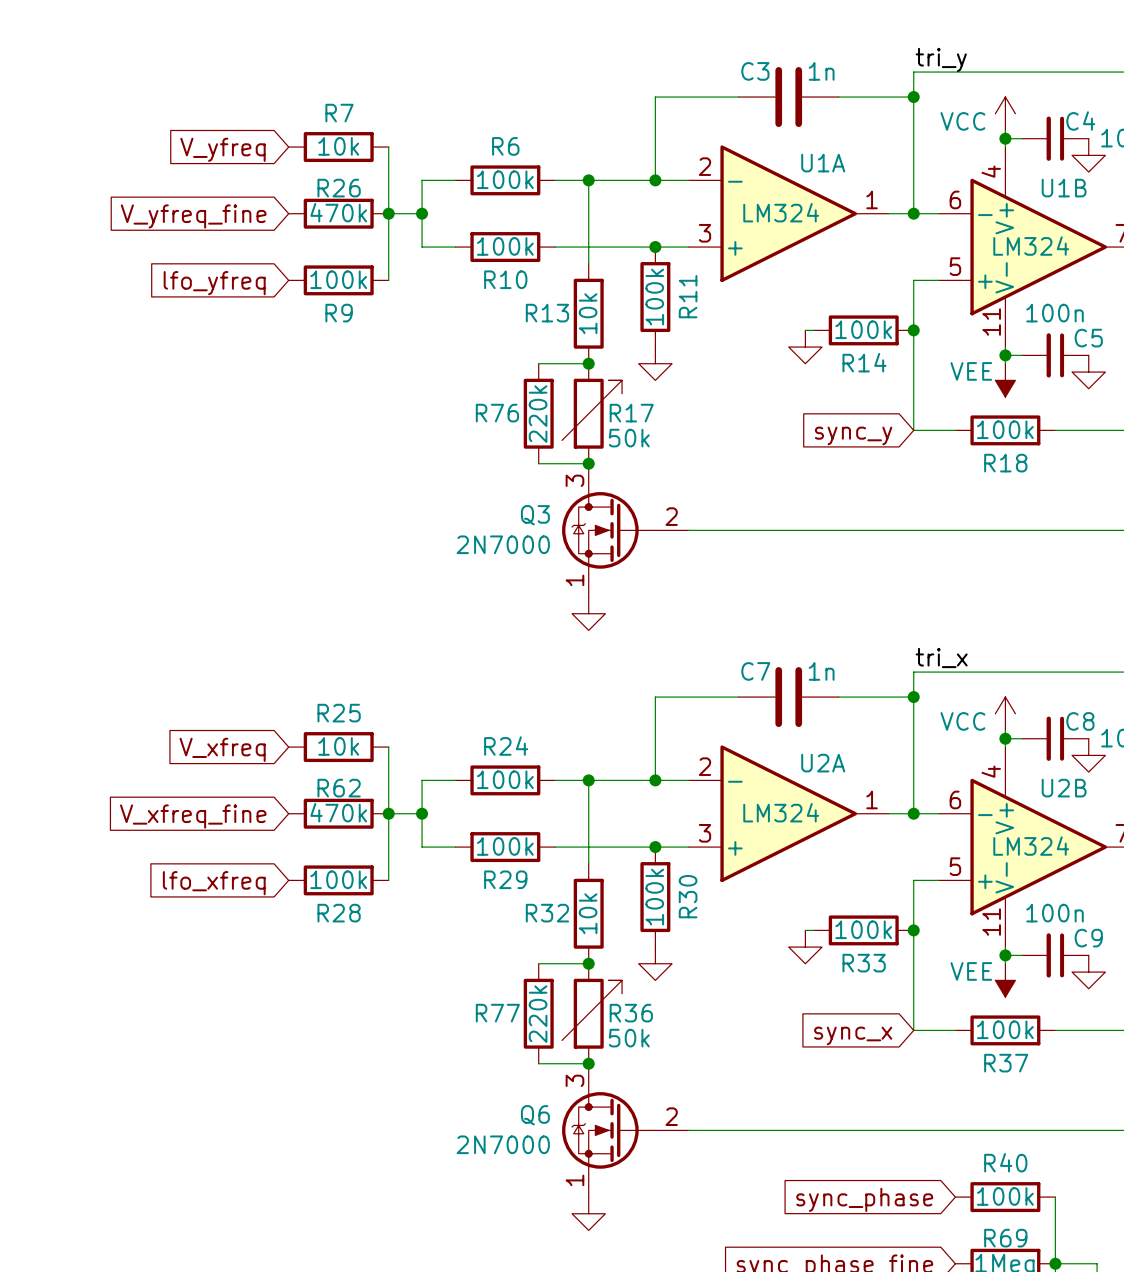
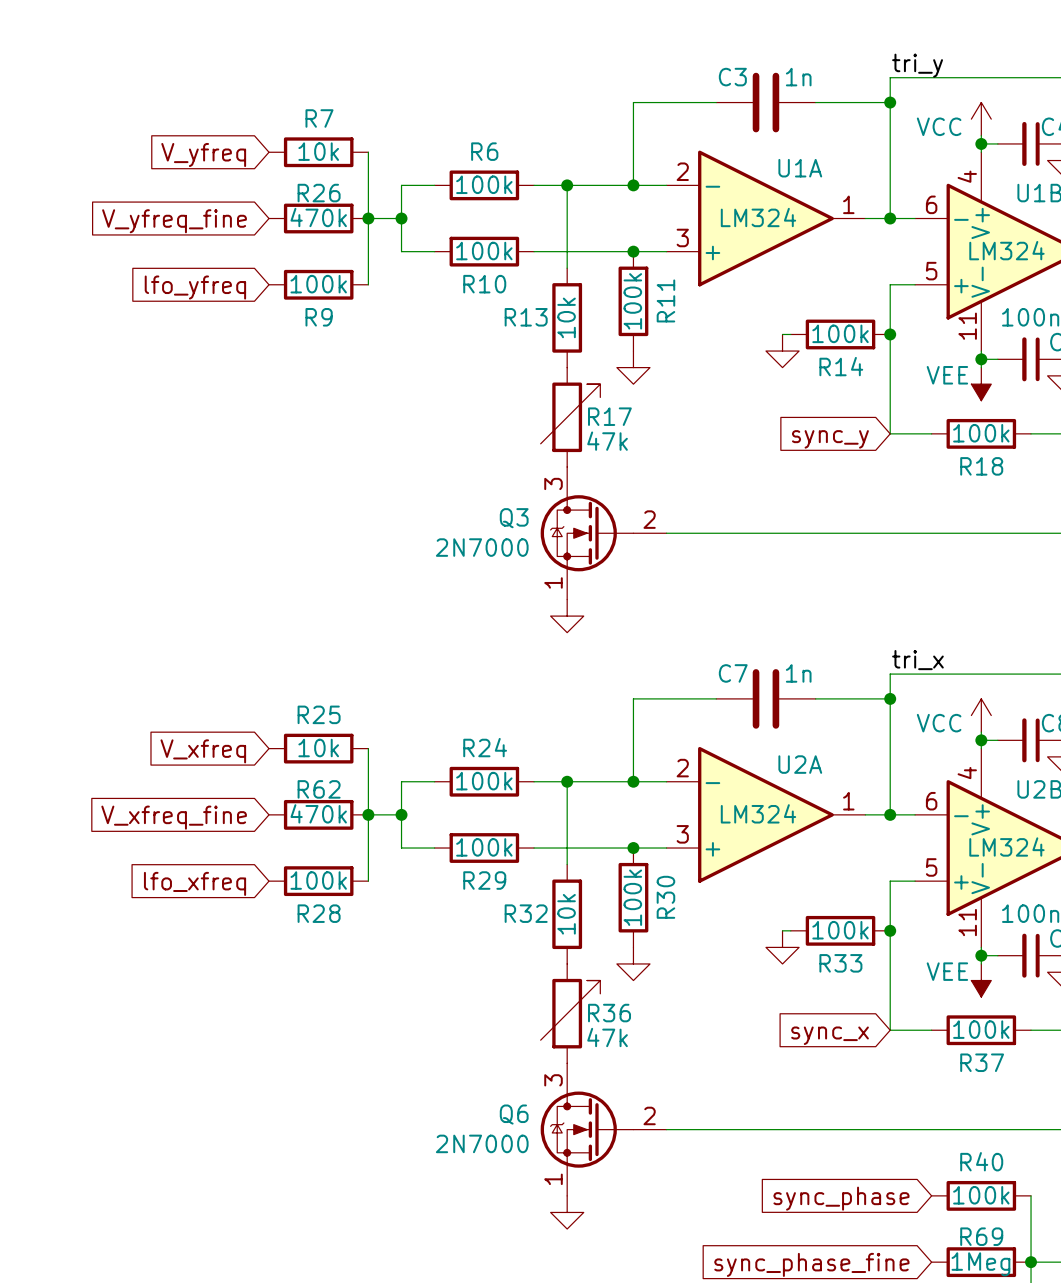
wire: (538, 363) (588, 363) -> none
junction: (588, 363) -> none
R76: 220k (538, 413) -> none
R17 value: 50k (629, 438) -> 47k (607, 441)
wire: (538, 463) (588, 463) -> none
junction: (588, 463) -> none
wire: (538, 963) (588, 963) -> none
junction: (588, 963) -> none
R77: 220k (538, 1013) -> none
R36 value: 50k (629, 1038) -> 47k (607, 1037)
wire: (538, 1063) (588, 1063) -> none
junction: (588, 1063) -> none

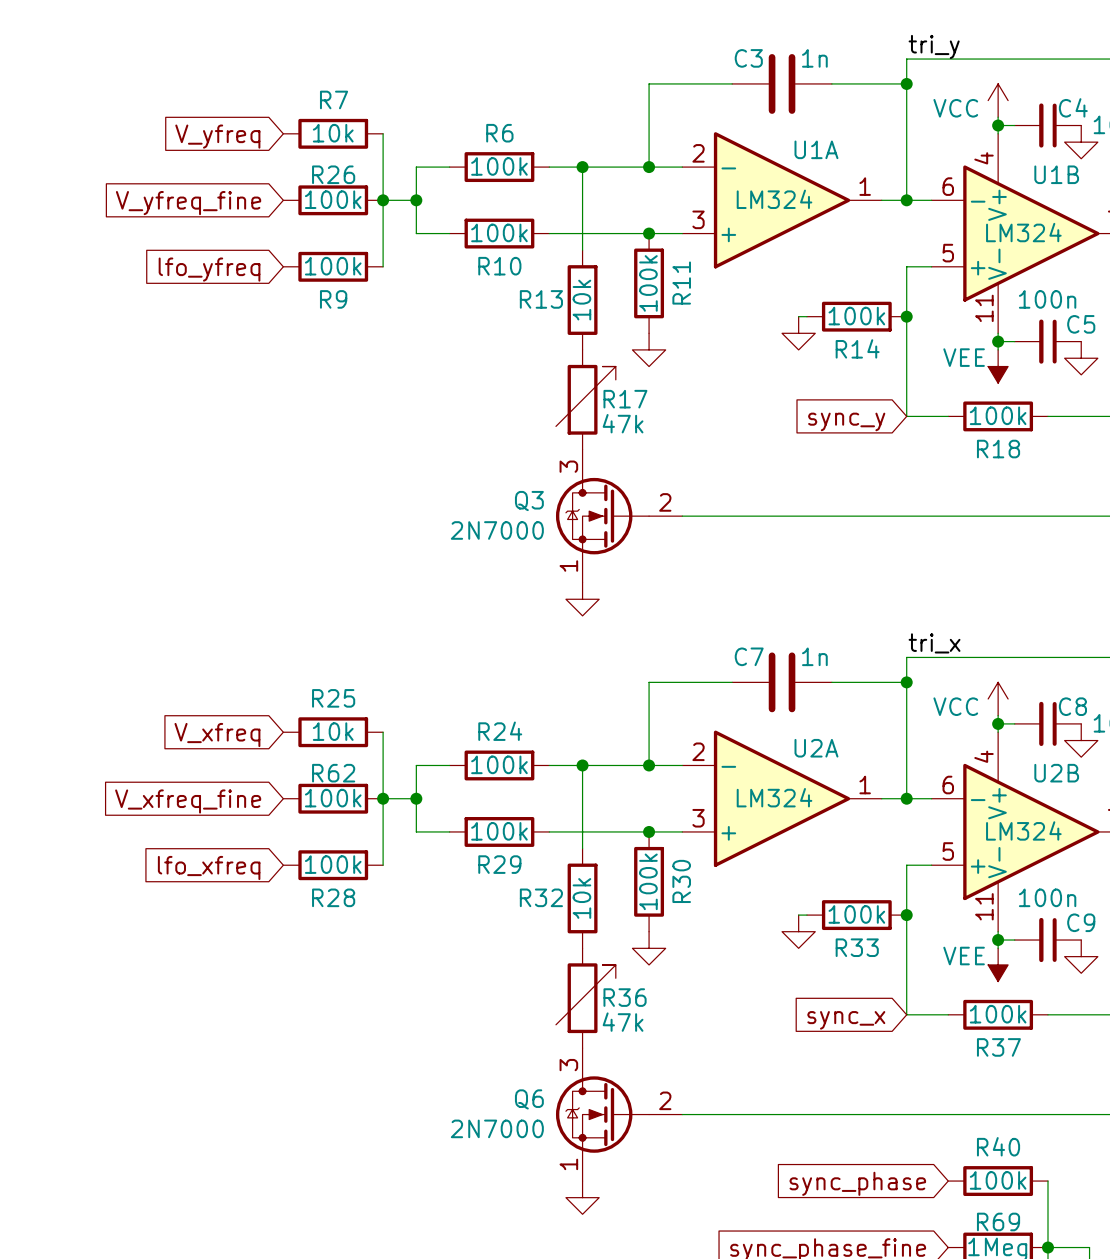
R26 value: 470k (318, 217) -> 100k (333, 199)
R62 value: 470k (318, 813) -> 100k (333, 798)

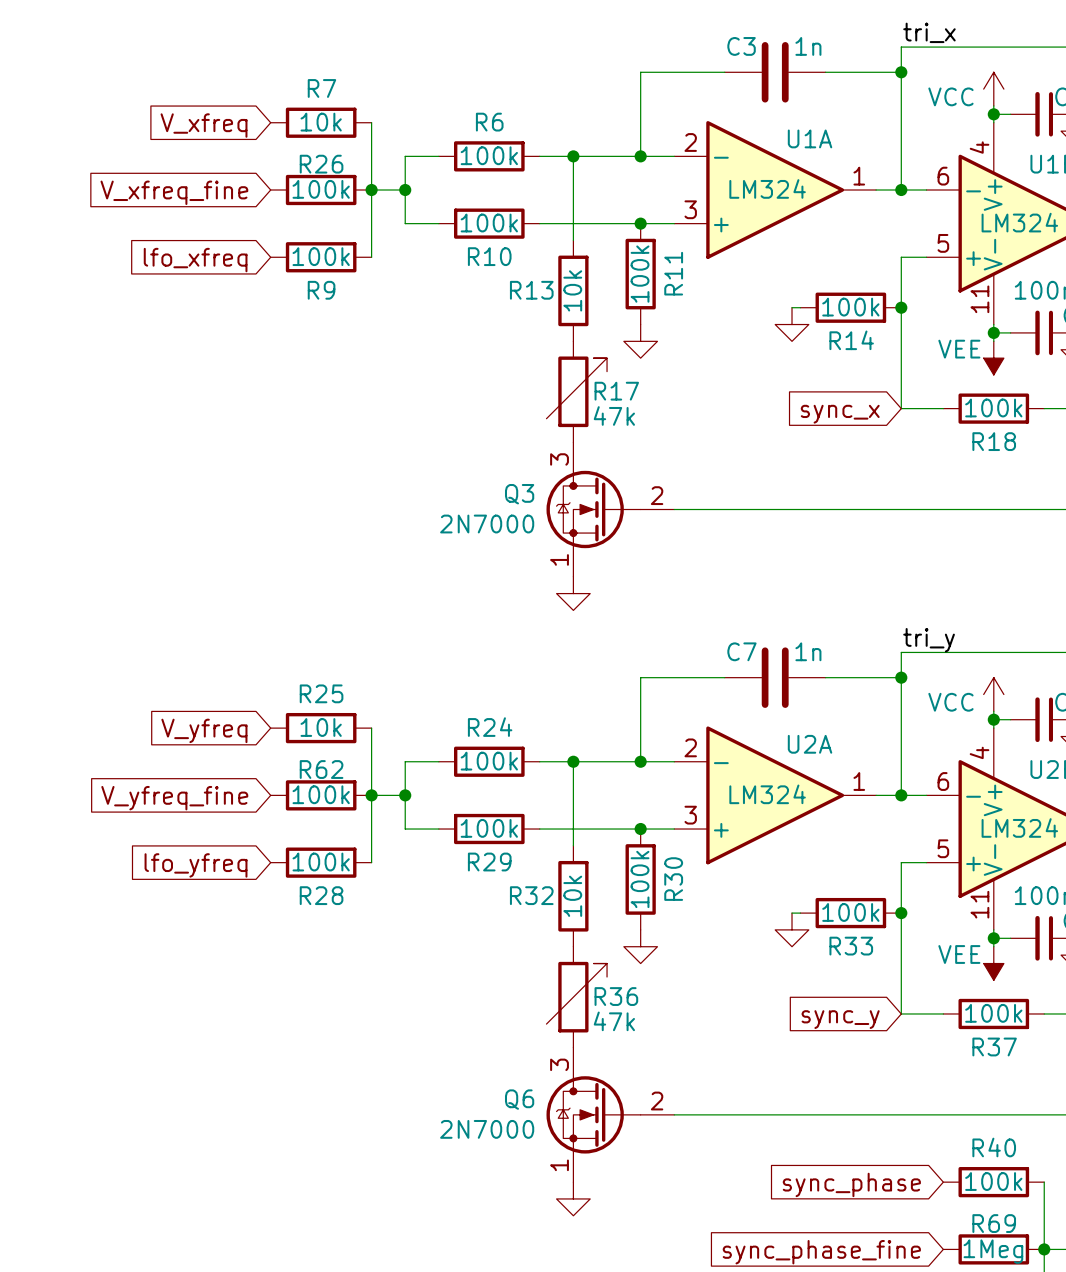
label: tri_y (934, 46) -> tri_x (929, 32)
global label: V_yfreq (217, 136) -> V_xfreq (204, 125)
global label: V_yfreq_fine (188, 203) -> V_xfreq_fine (174, 192)
global label: lfo_yfreq (209, 269) -> lfo_xfreq (195, 260)
global label: sync_y (846, 421) -> sync_x (840, 414)
label: tri_x (934, 643) -> tri_y (929, 640)
global label: V_xfreq (217, 735) -> V_yfreq (204, 730)
global label: V_xfreq_fine (188, 801) -> V_yfreq_fine (174, 798)
global label: lfo_xfreq (209, 867) -> lfo_yfreq (196, 865)
global label: sync_x (846, 1020) -> sync_y (840, 1019)

